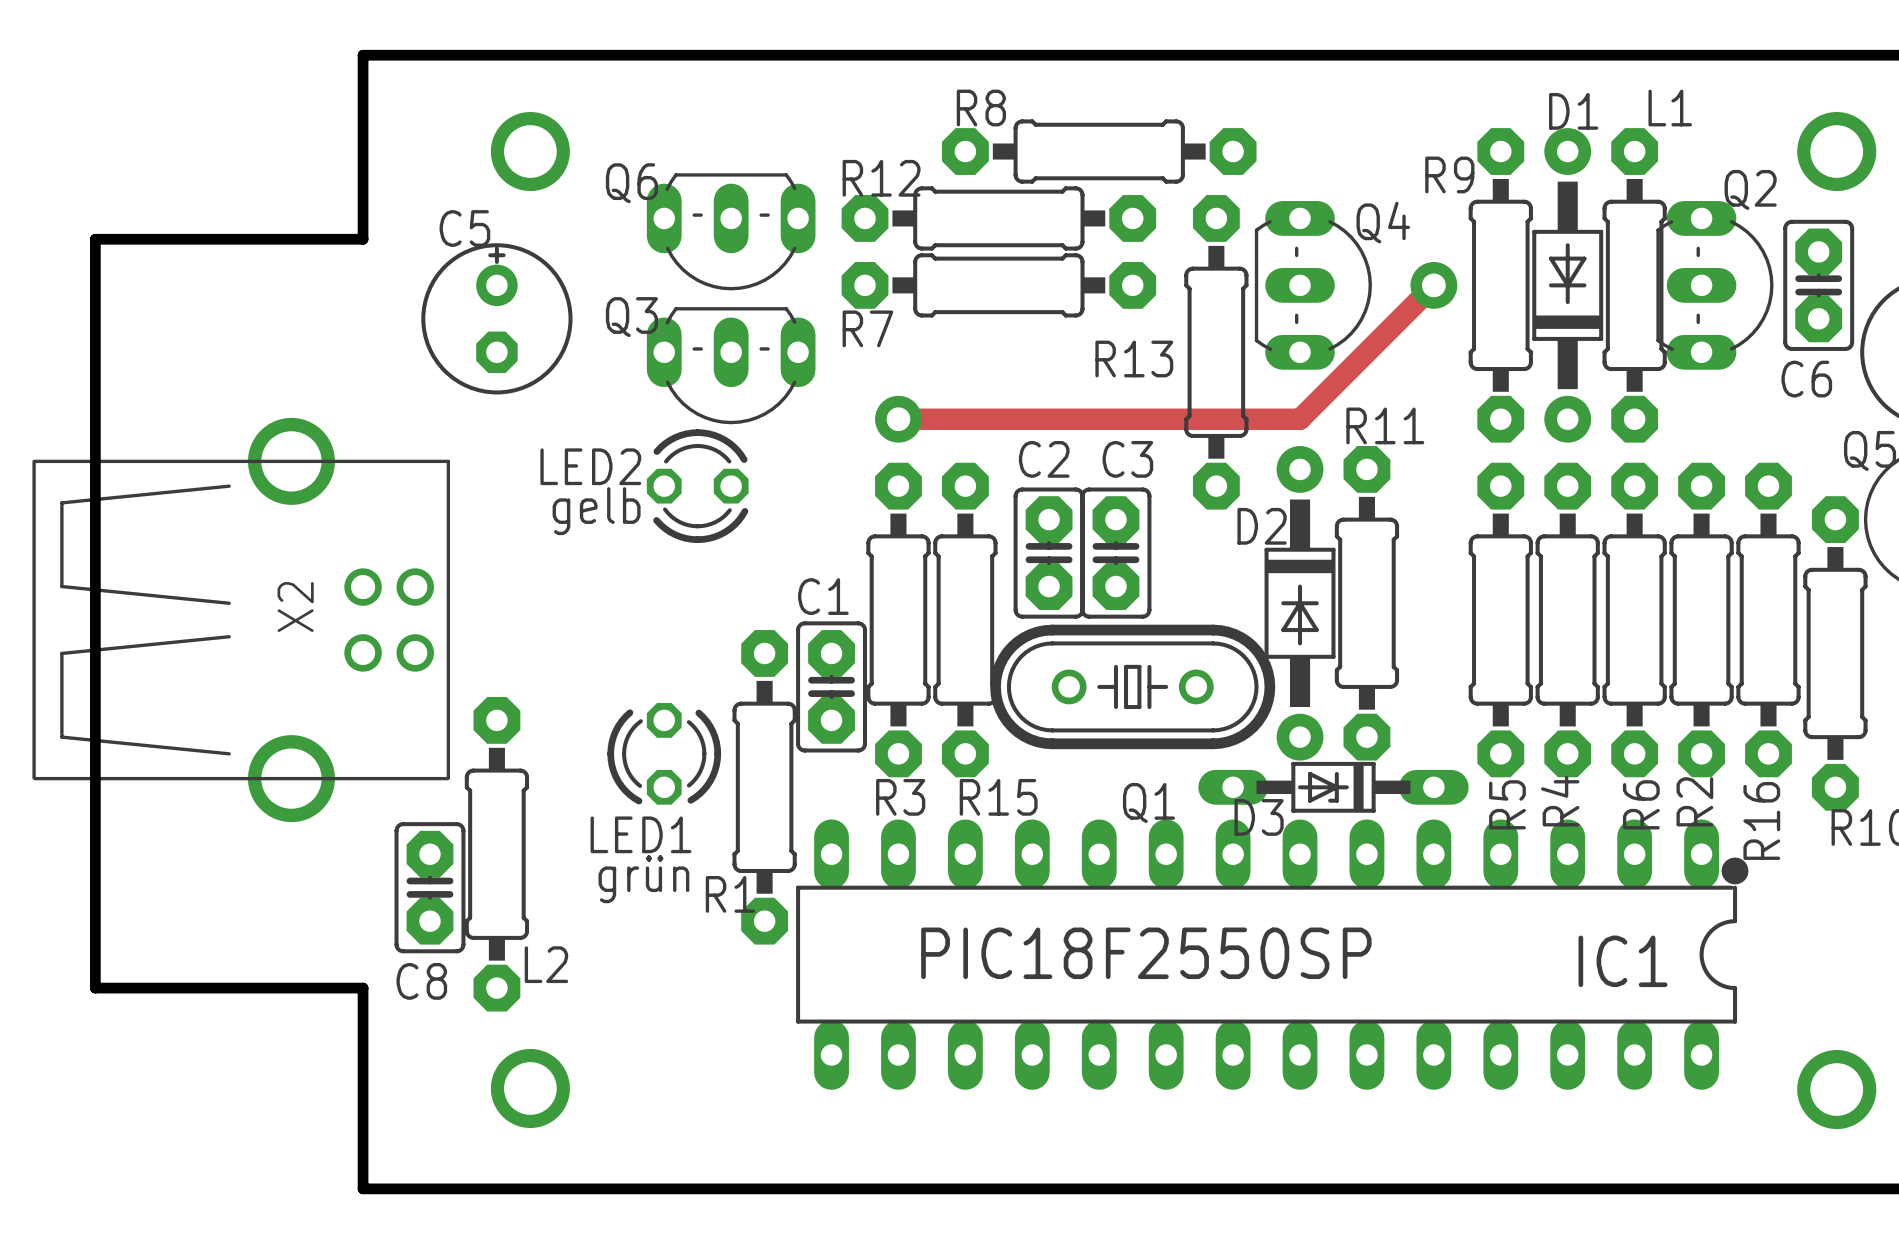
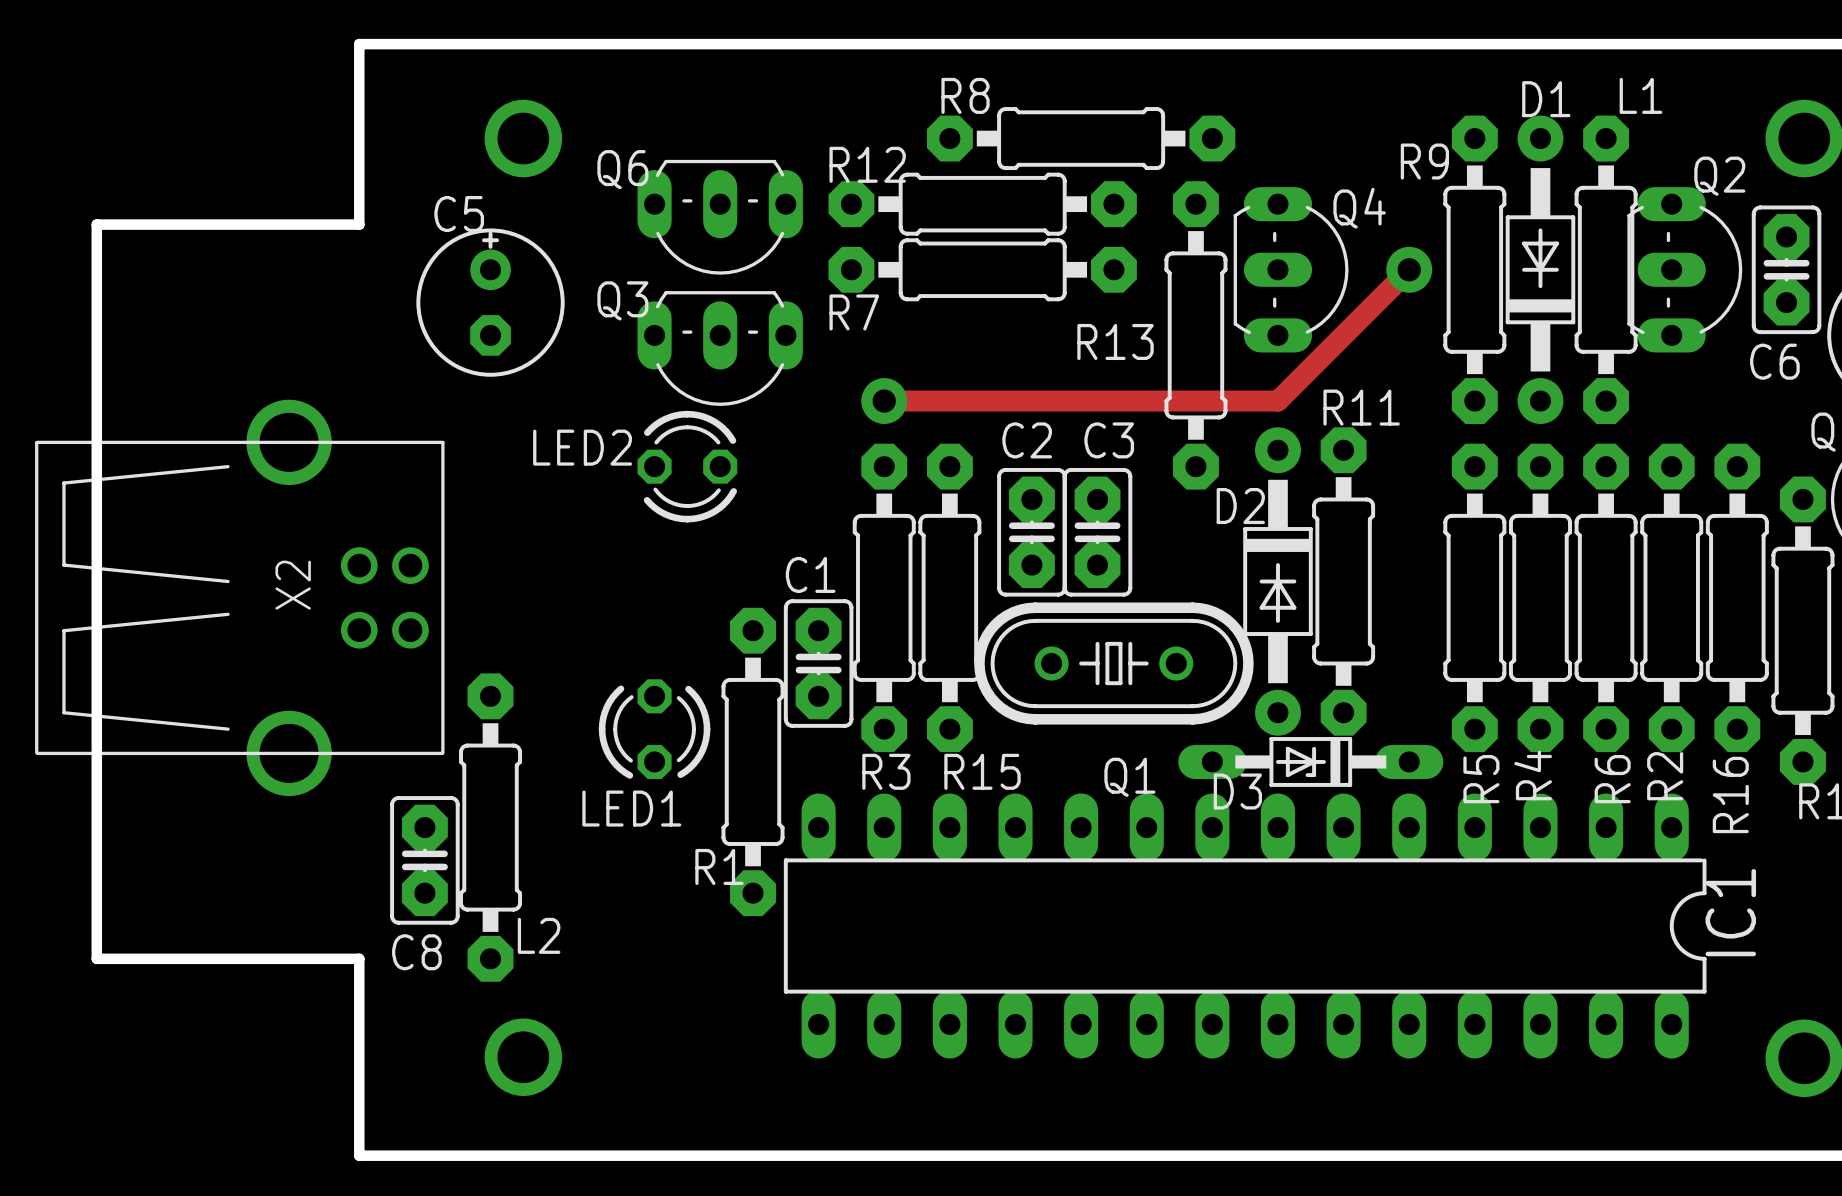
LED2 value: gelb (596, 511) -> none
drawing: [1721, 857, 1749, 885] -> none
LED1 value: grün (643, 879) -> none
IC1 value: PIC18F2550SP (1146, 953) -> none
IC1 name rotation: 0° (1623, 961) -> 90° counterclockwise (1730, 912)

